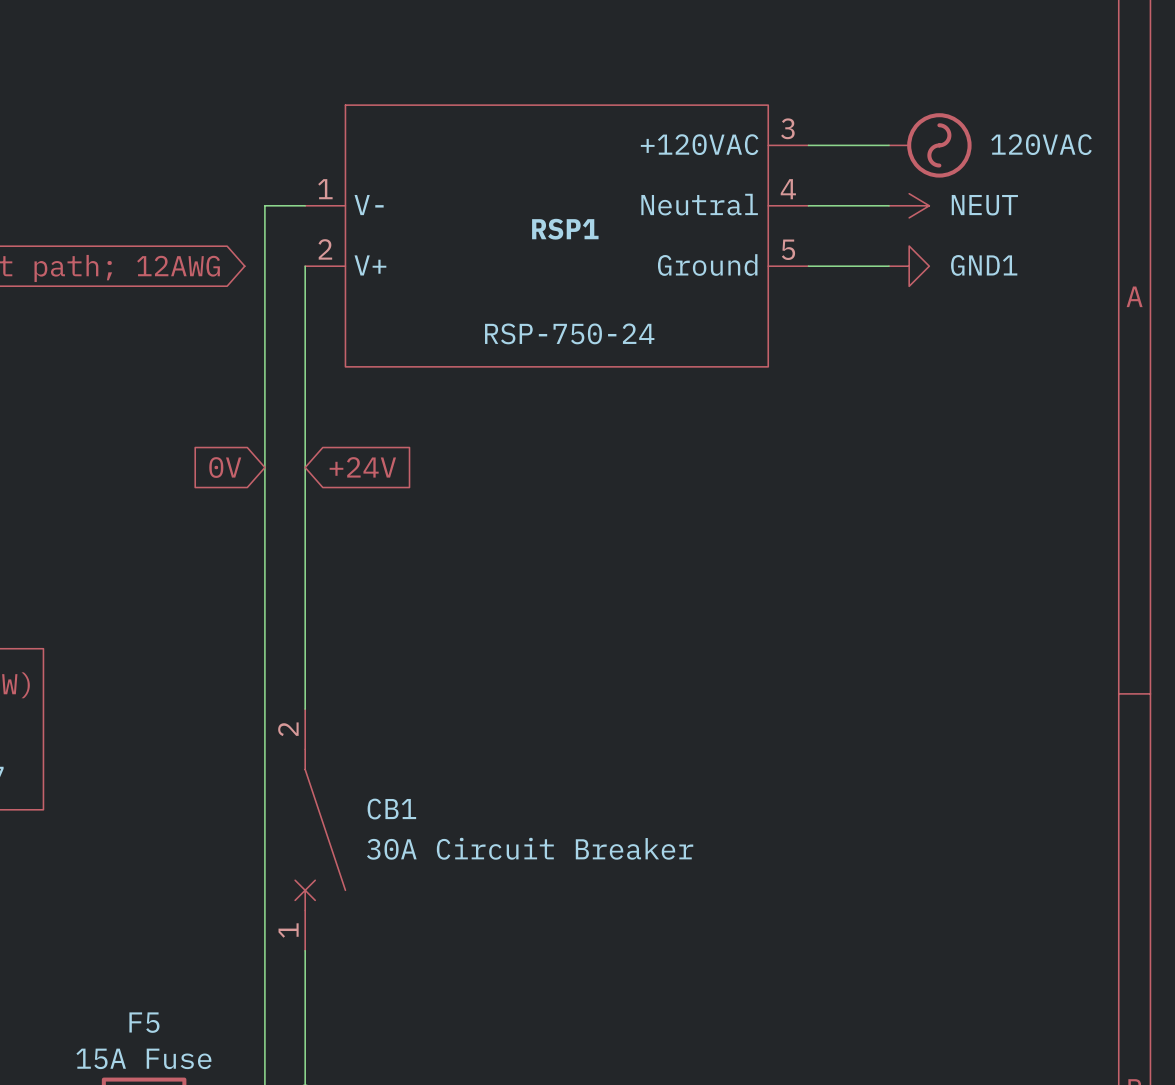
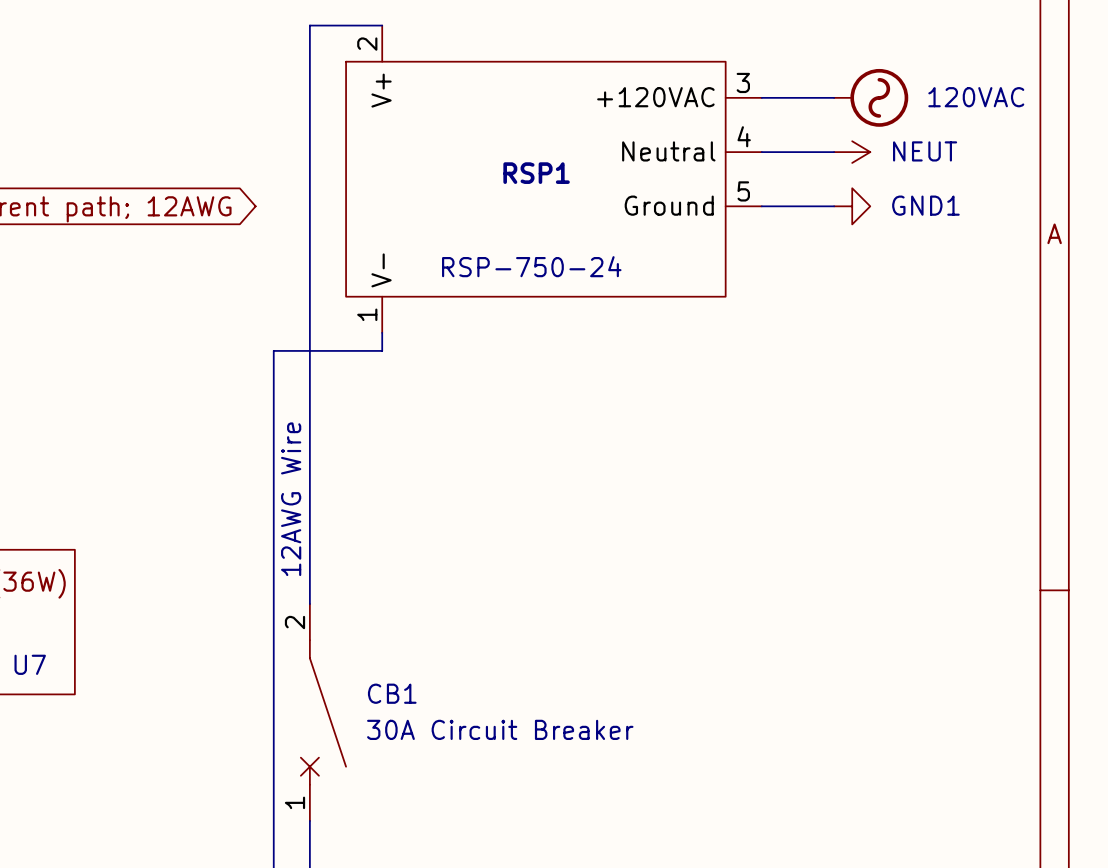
wire: none -> (382, 25) (309, 25) (309, 206)
RSP1 shape: [305, 105, 809, 367] -> [346, 25, 762, 333]
wire: (305, 205) (264, 205) (264, 427) -> (382, 332) (382, 350) (273, 350)
global label: 0V (225, 467) -> none
global label: +24V (362, 467) -> none
text: none -> 12AWG Wire (291, 499)

